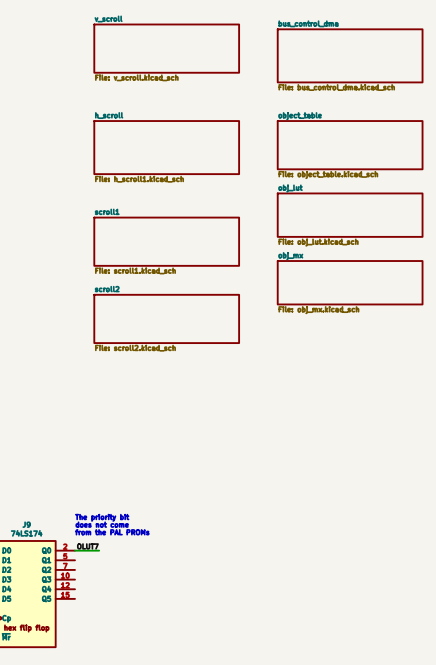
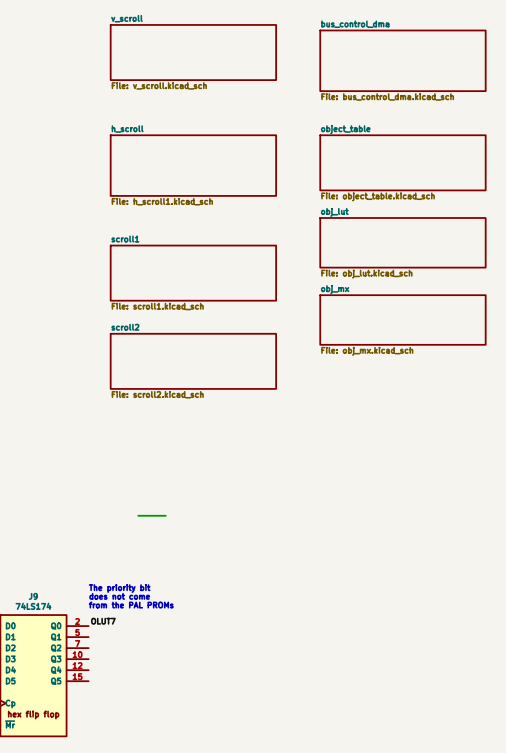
wire: none -> (138, 515) (165, 515)
wire: (74, 550) (99, 550) -> none

